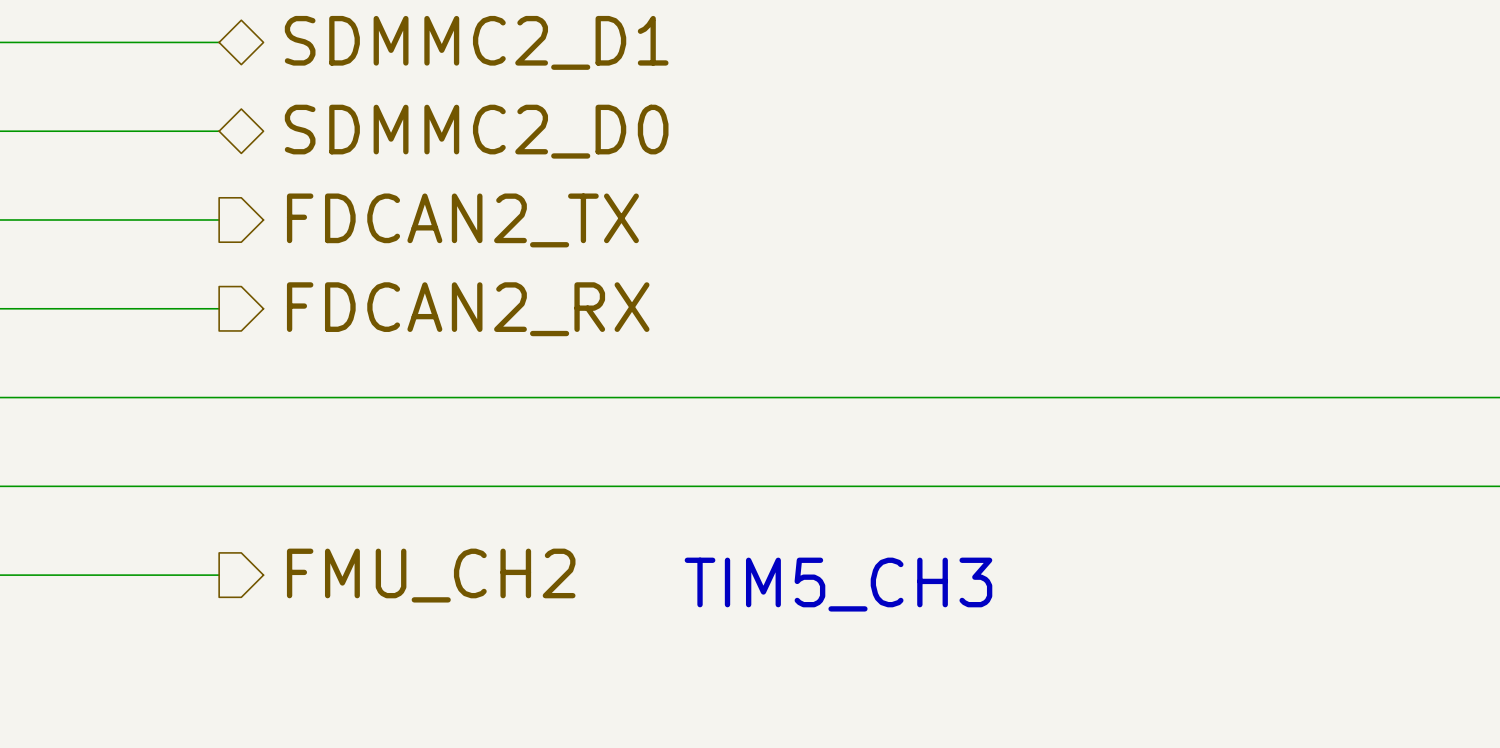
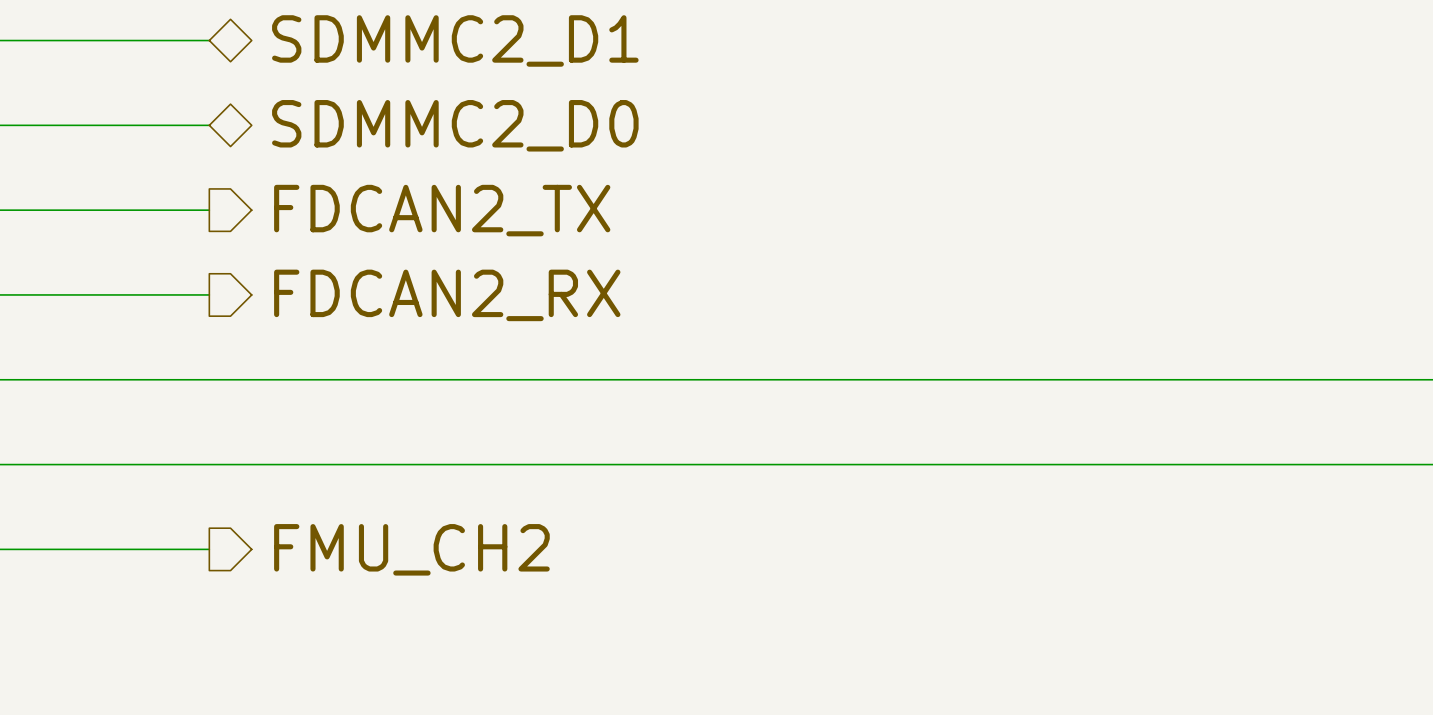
text: TIM5_CH3 (838, 584) -> none

